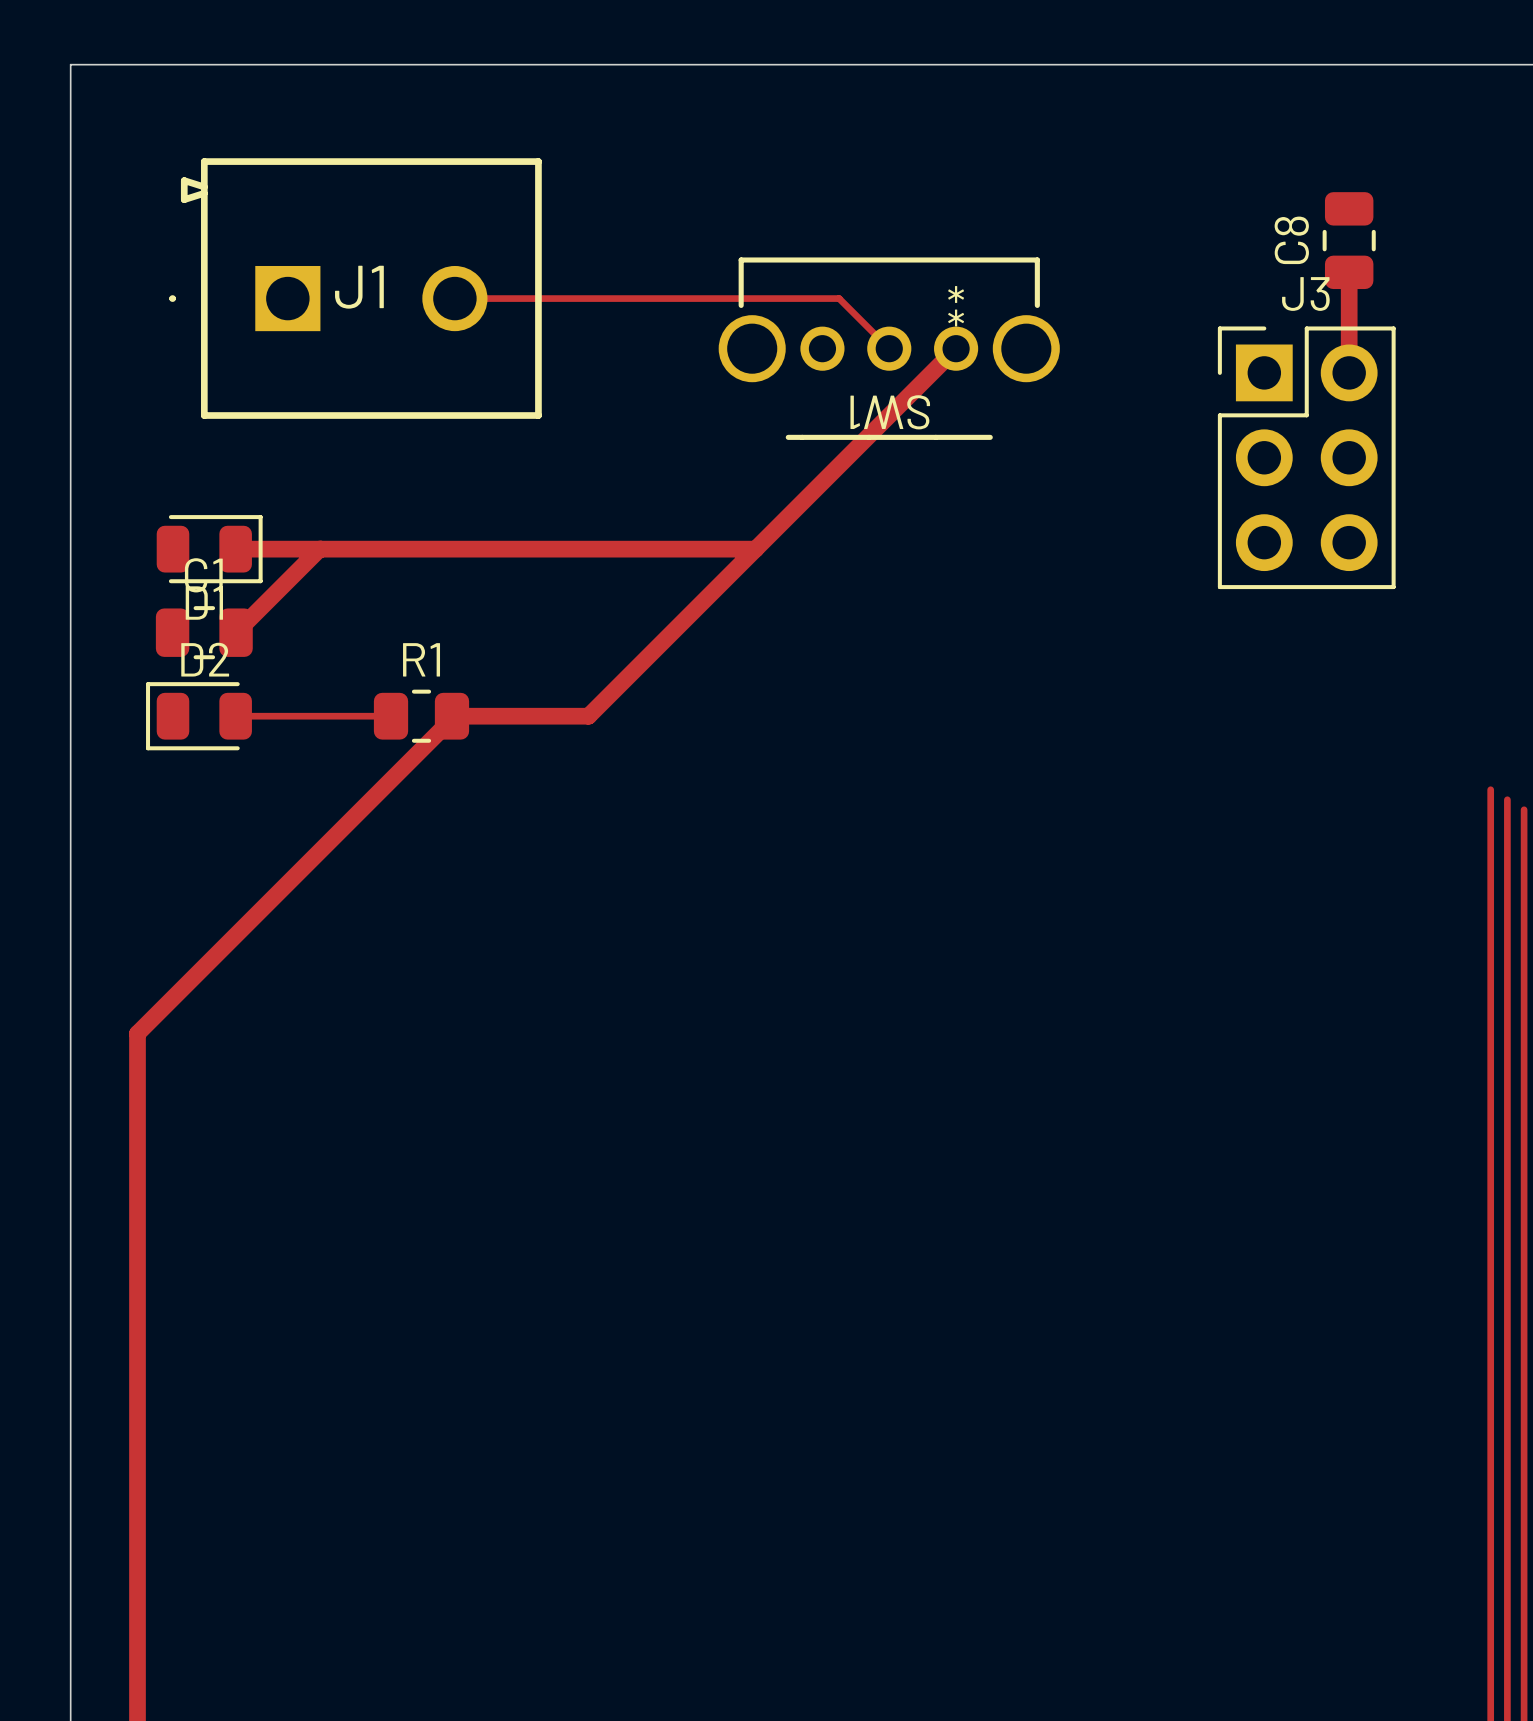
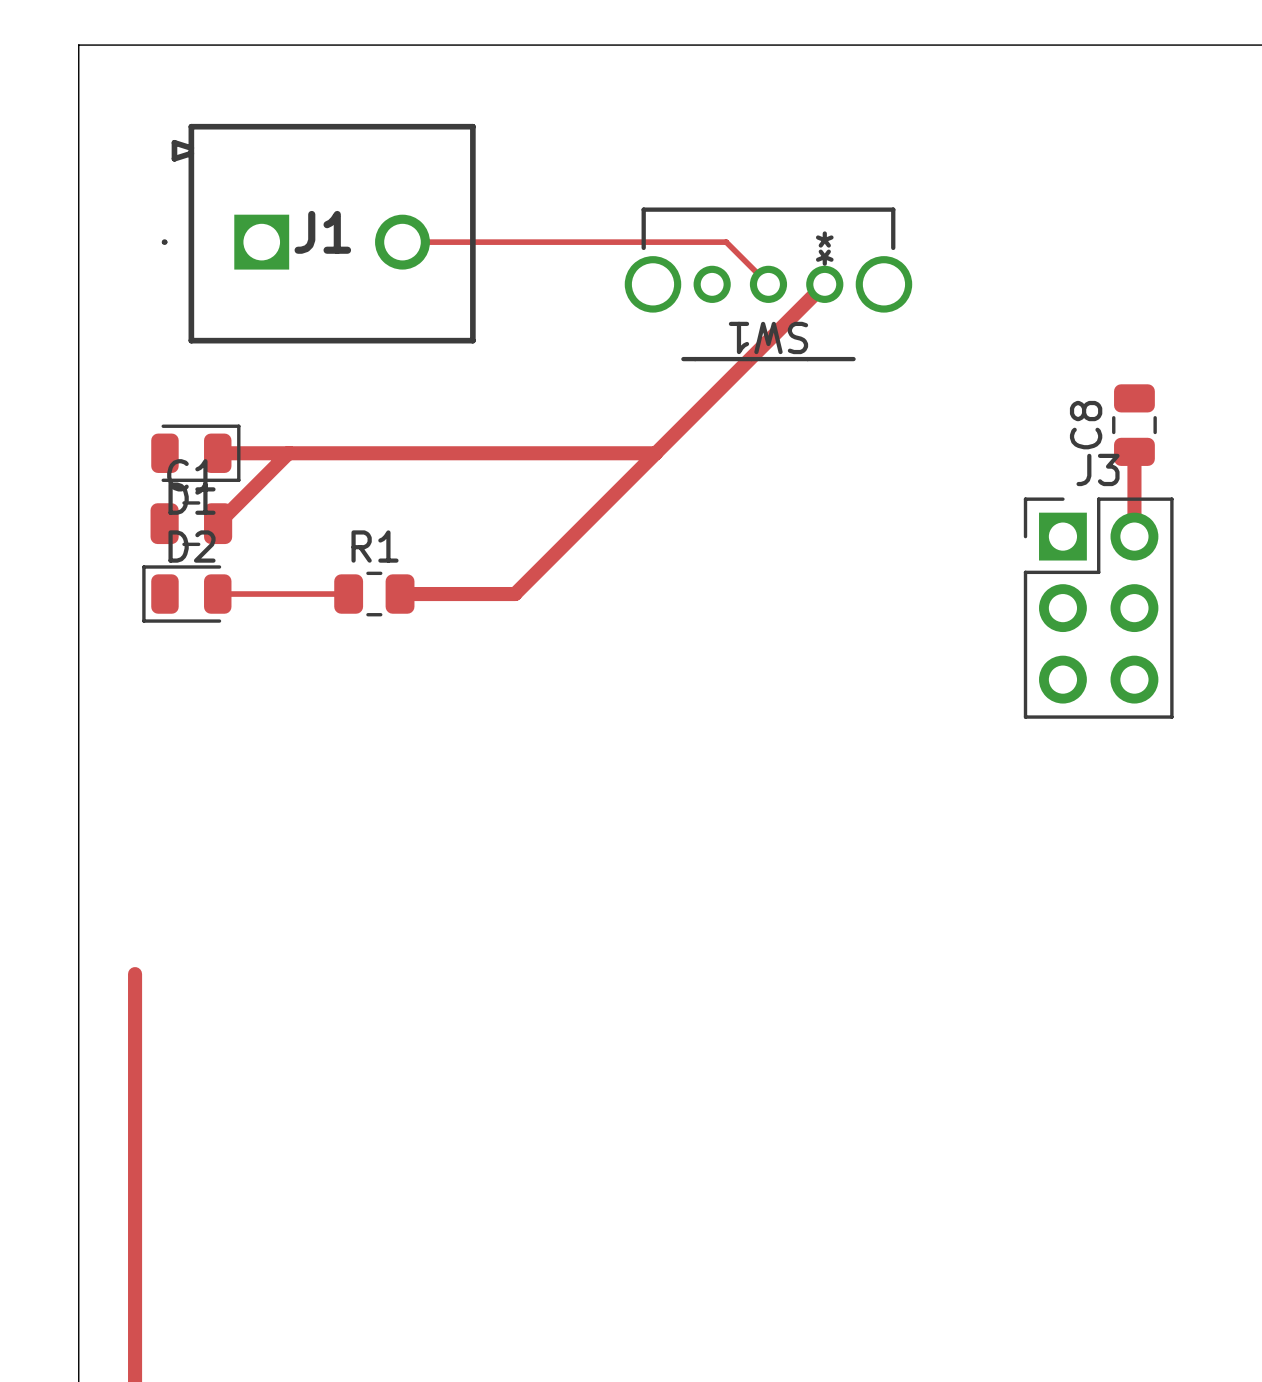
C8 position: (1349, 240) -> (1134, 425)
top track: (1349, 272) (1349, 372) -> (1134, 451) (1134, 536)
J3 position: (1306, 457) -> (1098, 608)
top track: (451, 716) (451, 719) (137, 1033) (137, 1167) -> none

